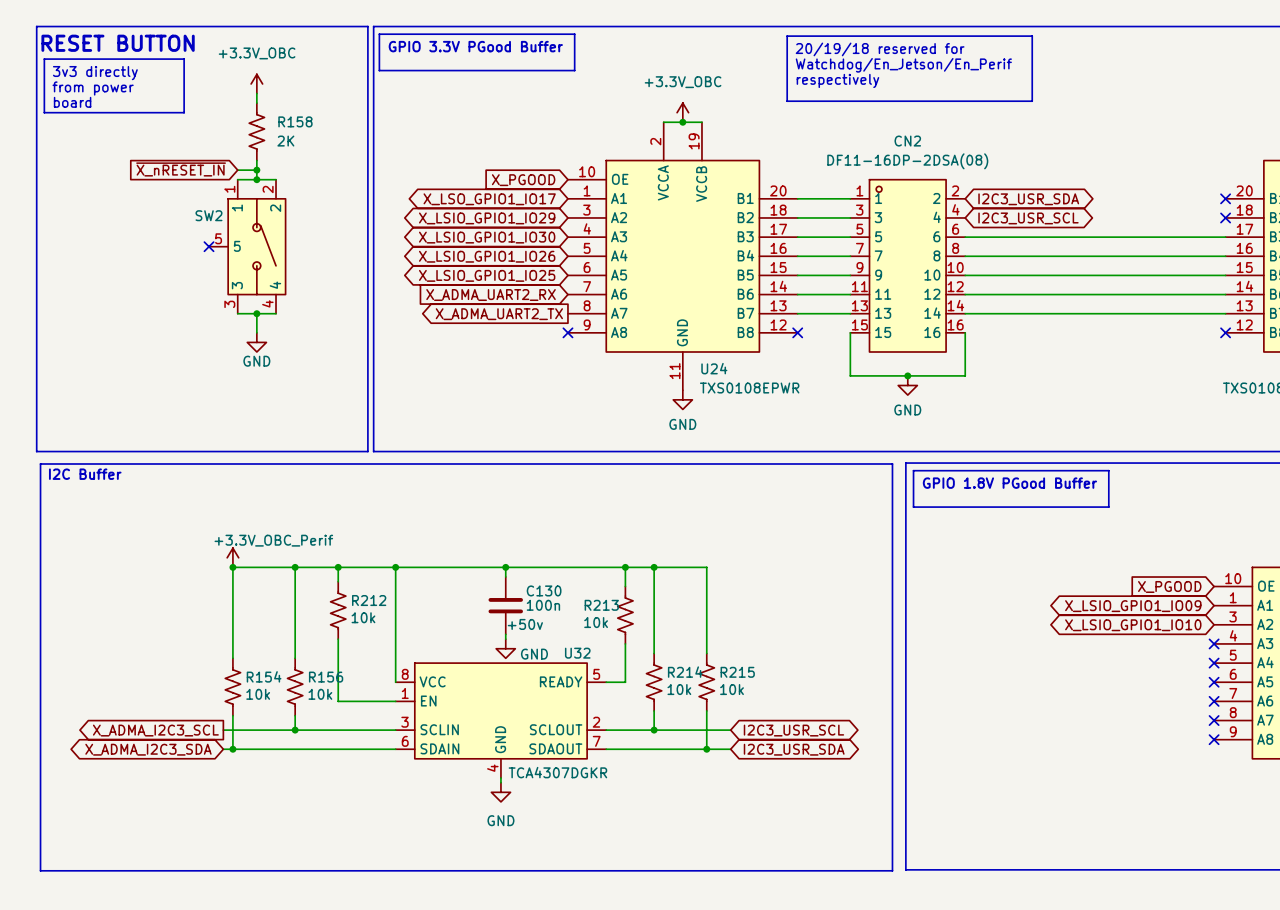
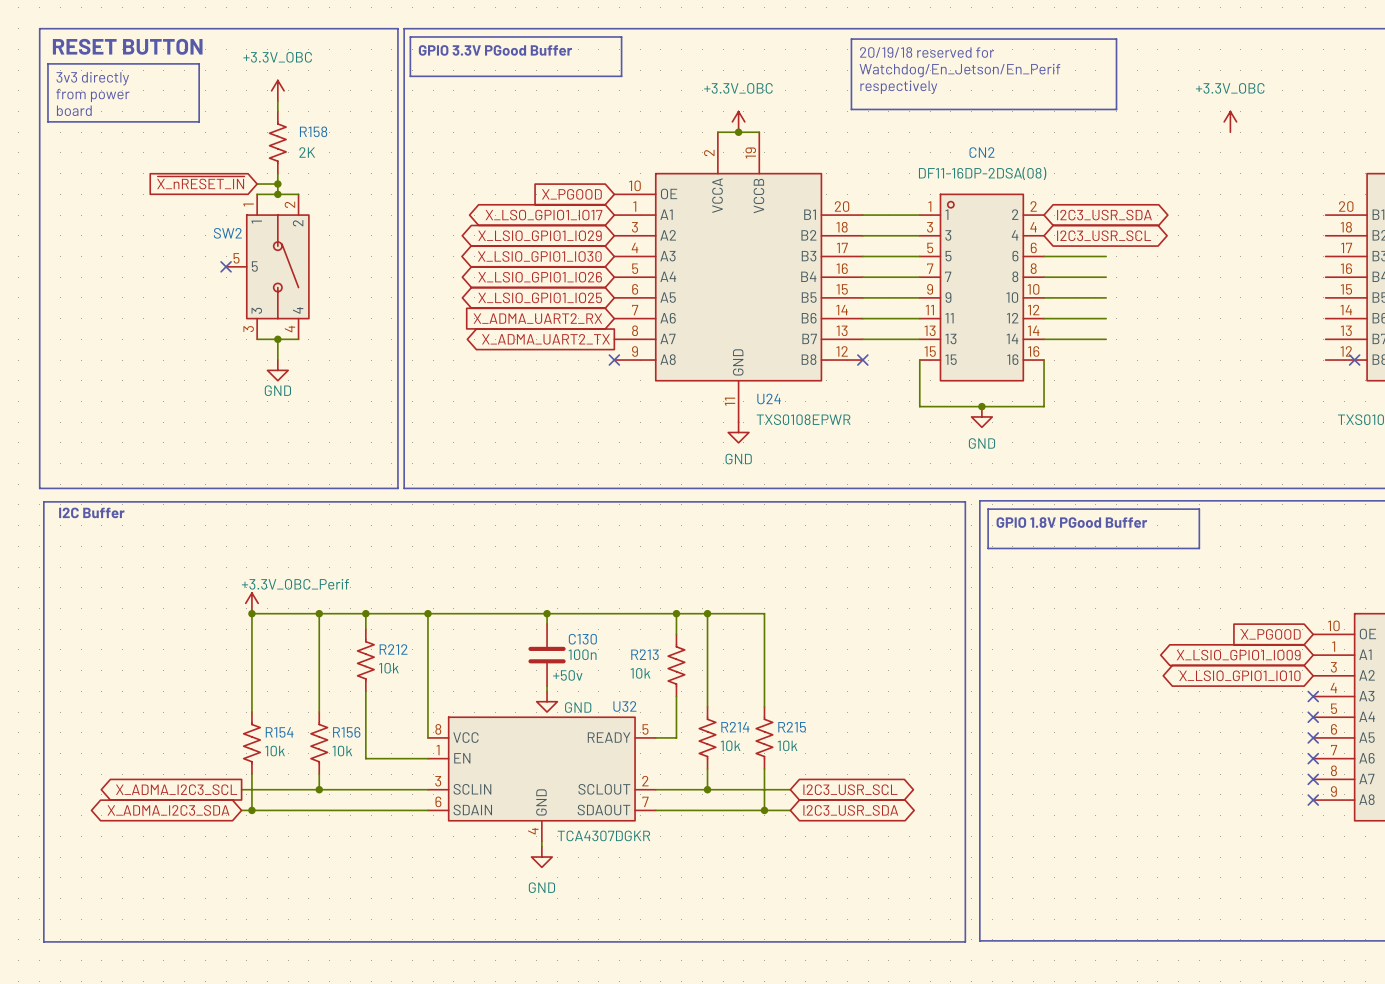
power symbol: none -> +3.3V_OBC (1230, 121)
no-connect mark: (1225, 198) -> none
no-connect mark: (1225, 217) -> none
wire: (1022, 237) (1225, 237) -> none
wire: (1022, 256) (1225, 256) -> none
wire: (1022, 275) (1225, 275) -> none
wire: (1022, 294) (1225, 294) -> none
wire: (1022, 313) (1225, 313) -> none
no-connect mark position: (1225, 332) -> (1354, 360)

